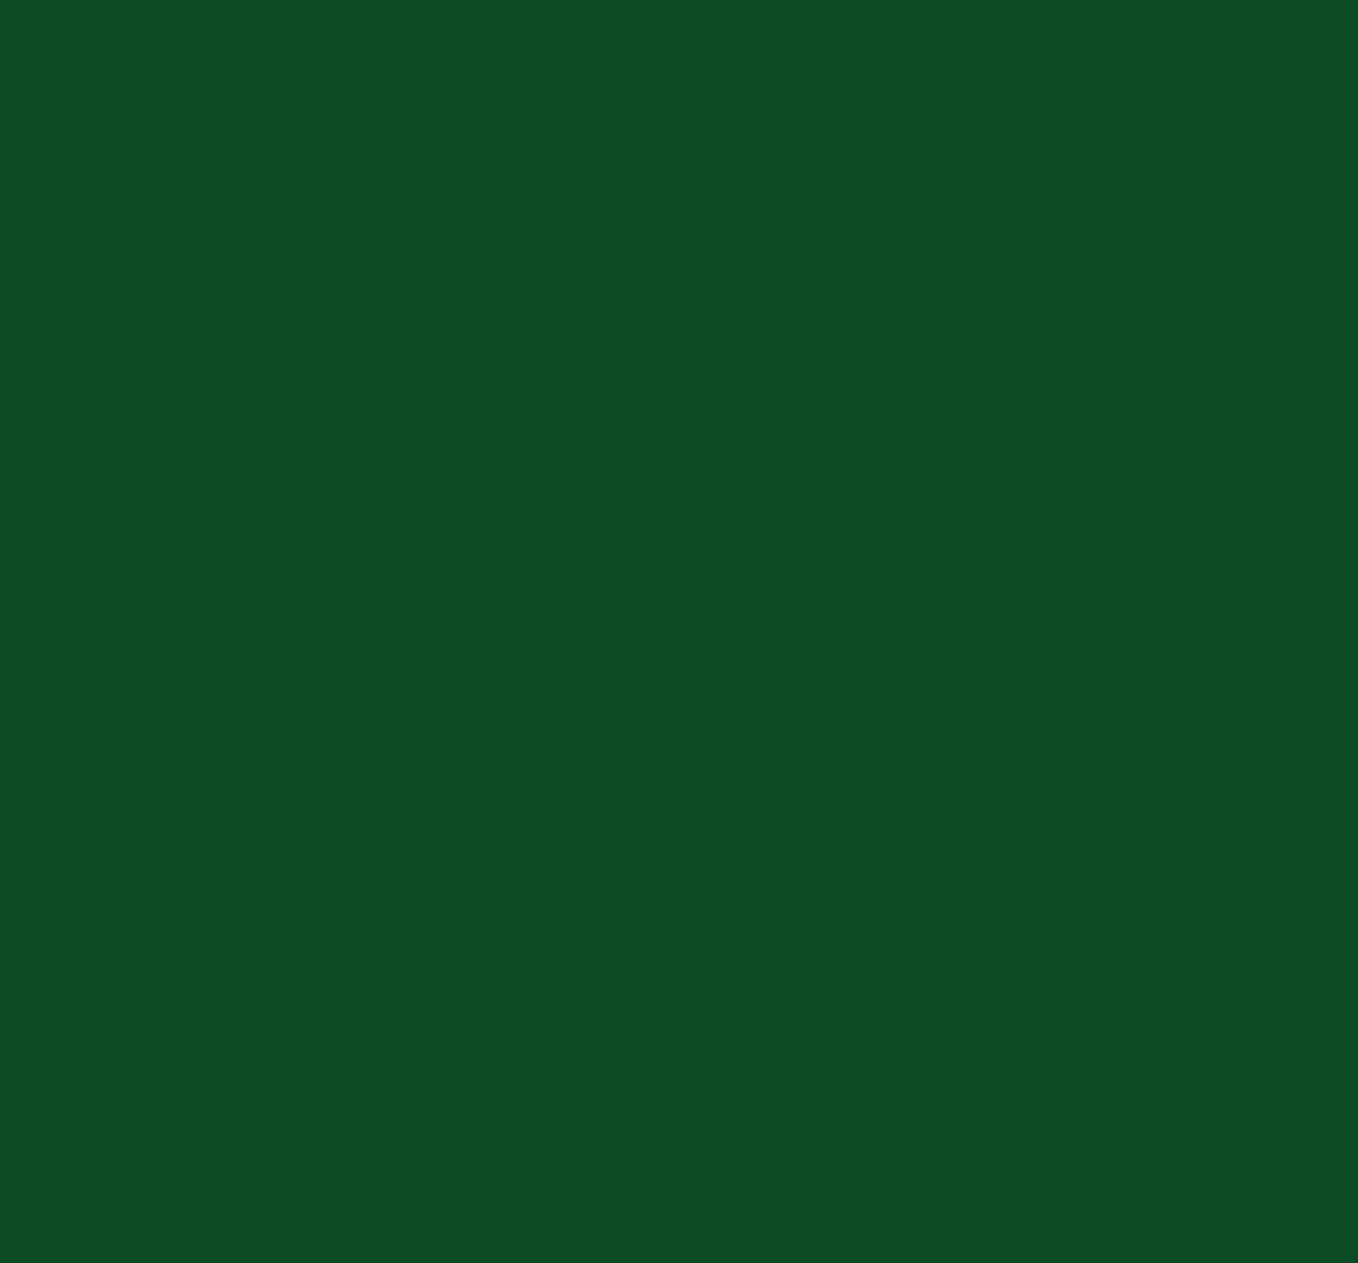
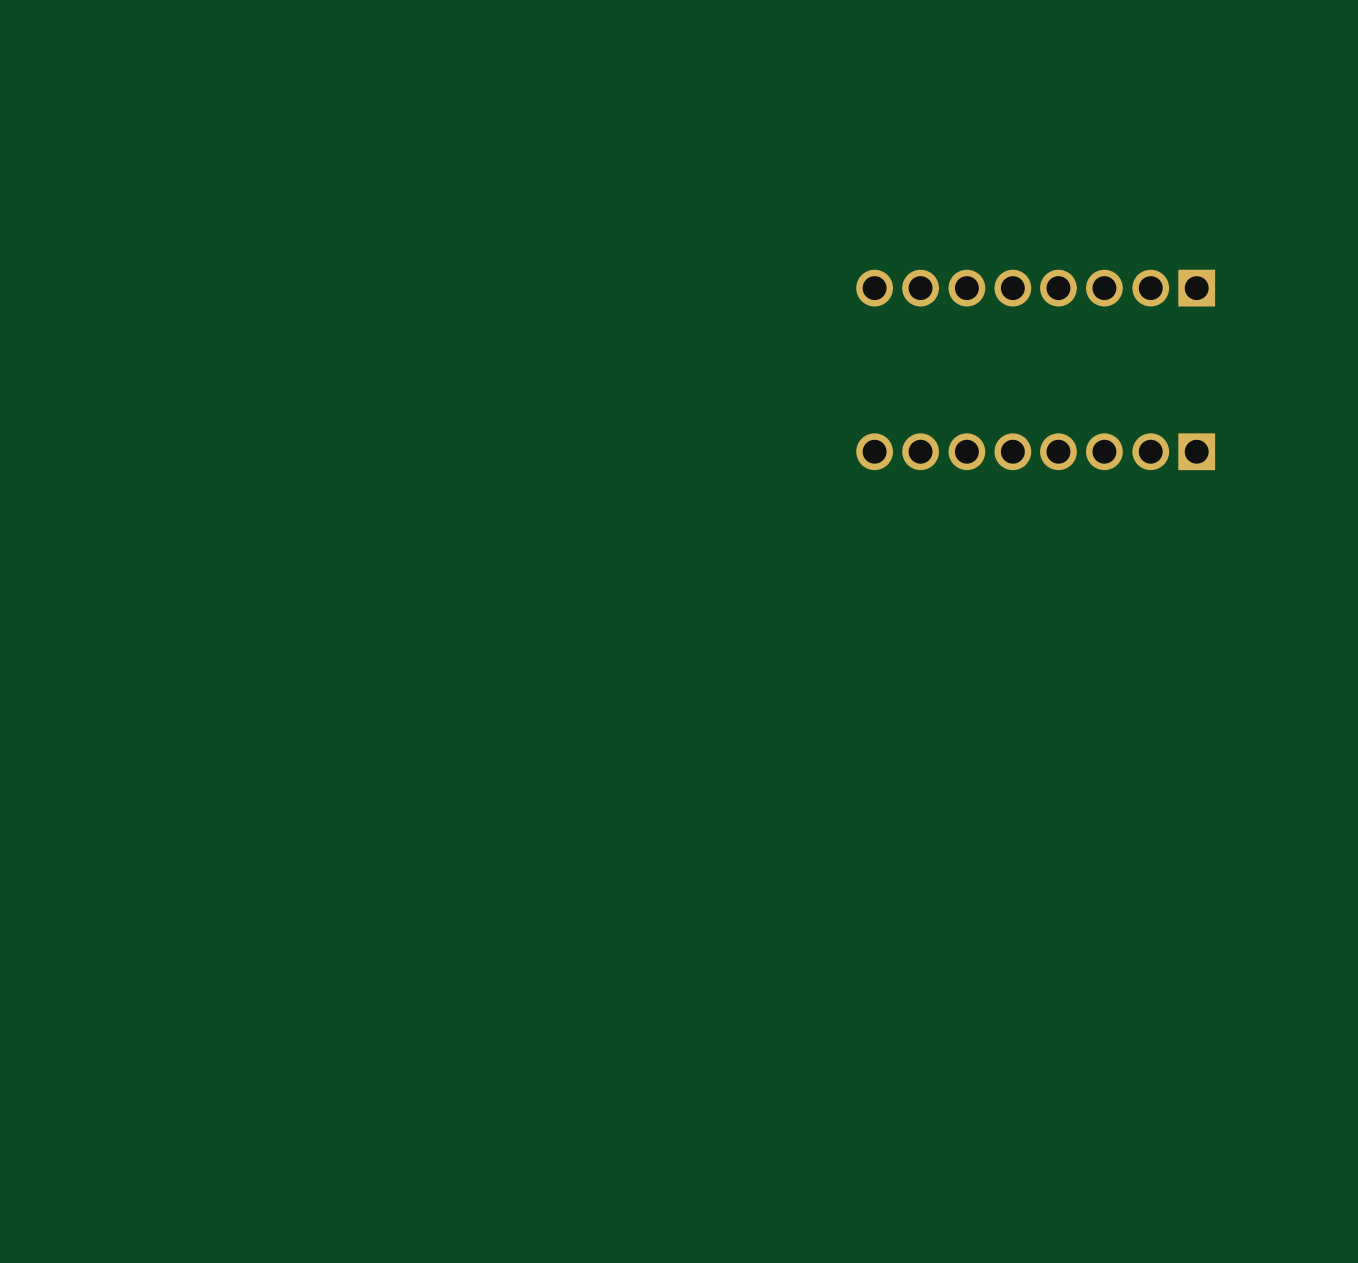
part: none -> (1035, 288)
part: none -> (1035, 451)

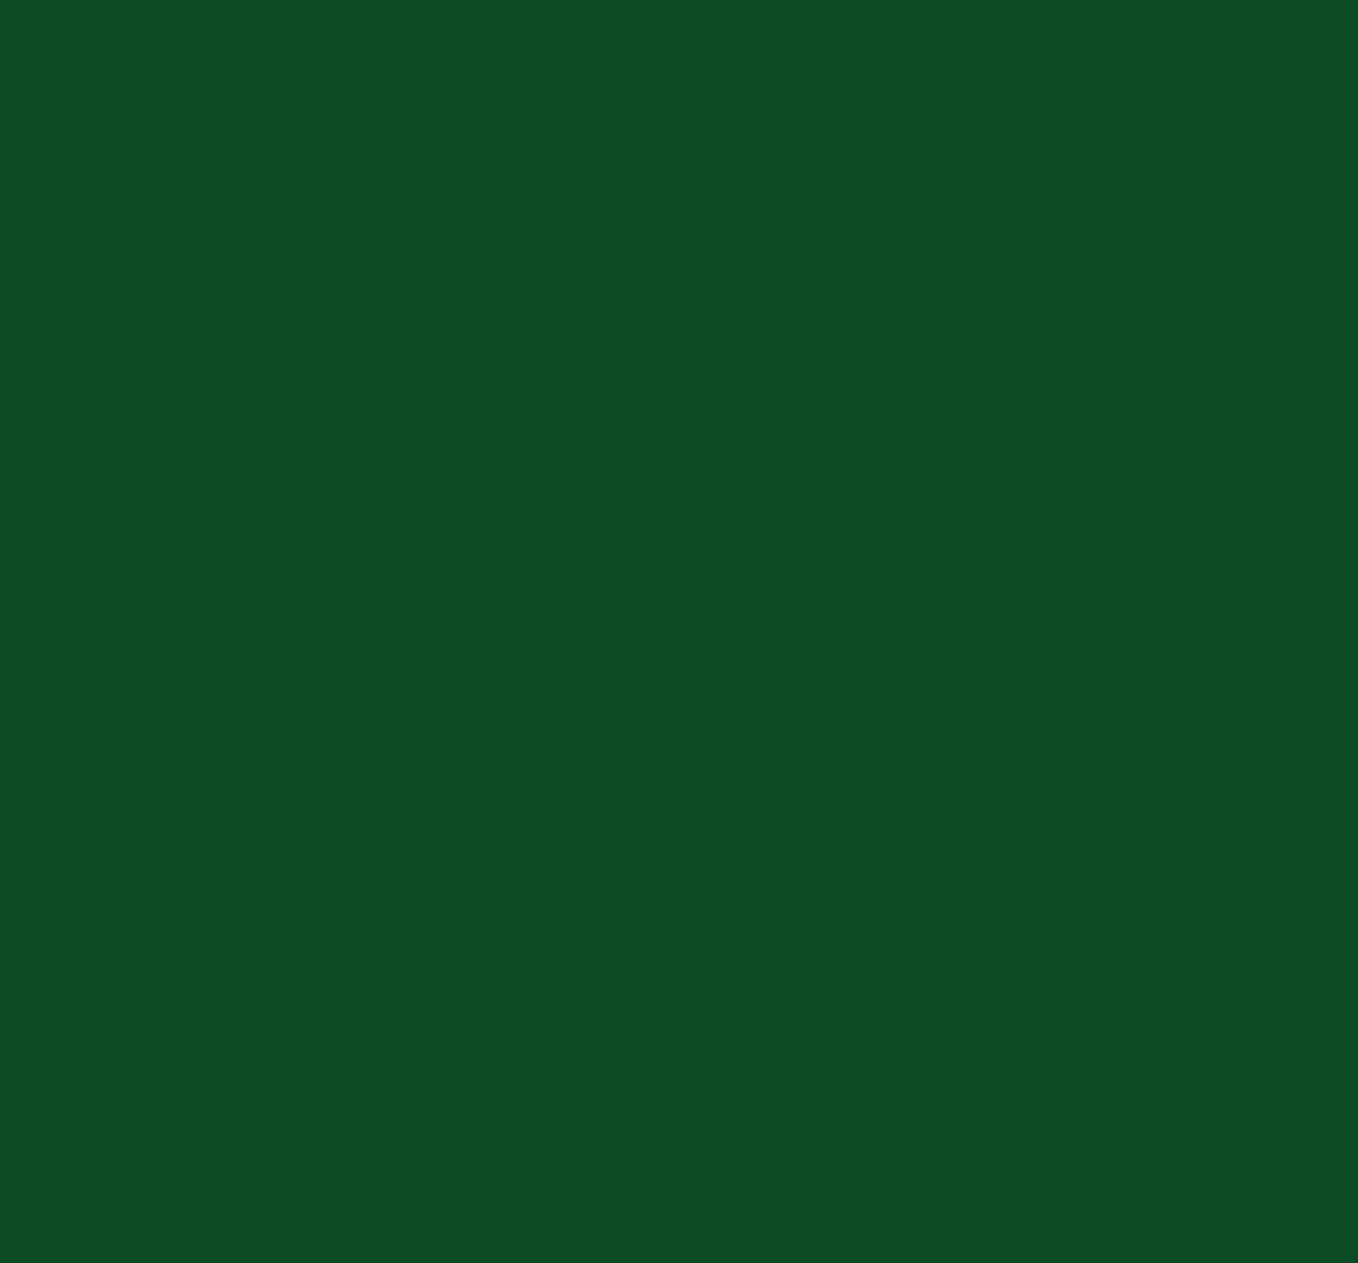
part: (1035, 288) -> none
part: (1035, 451) -> none

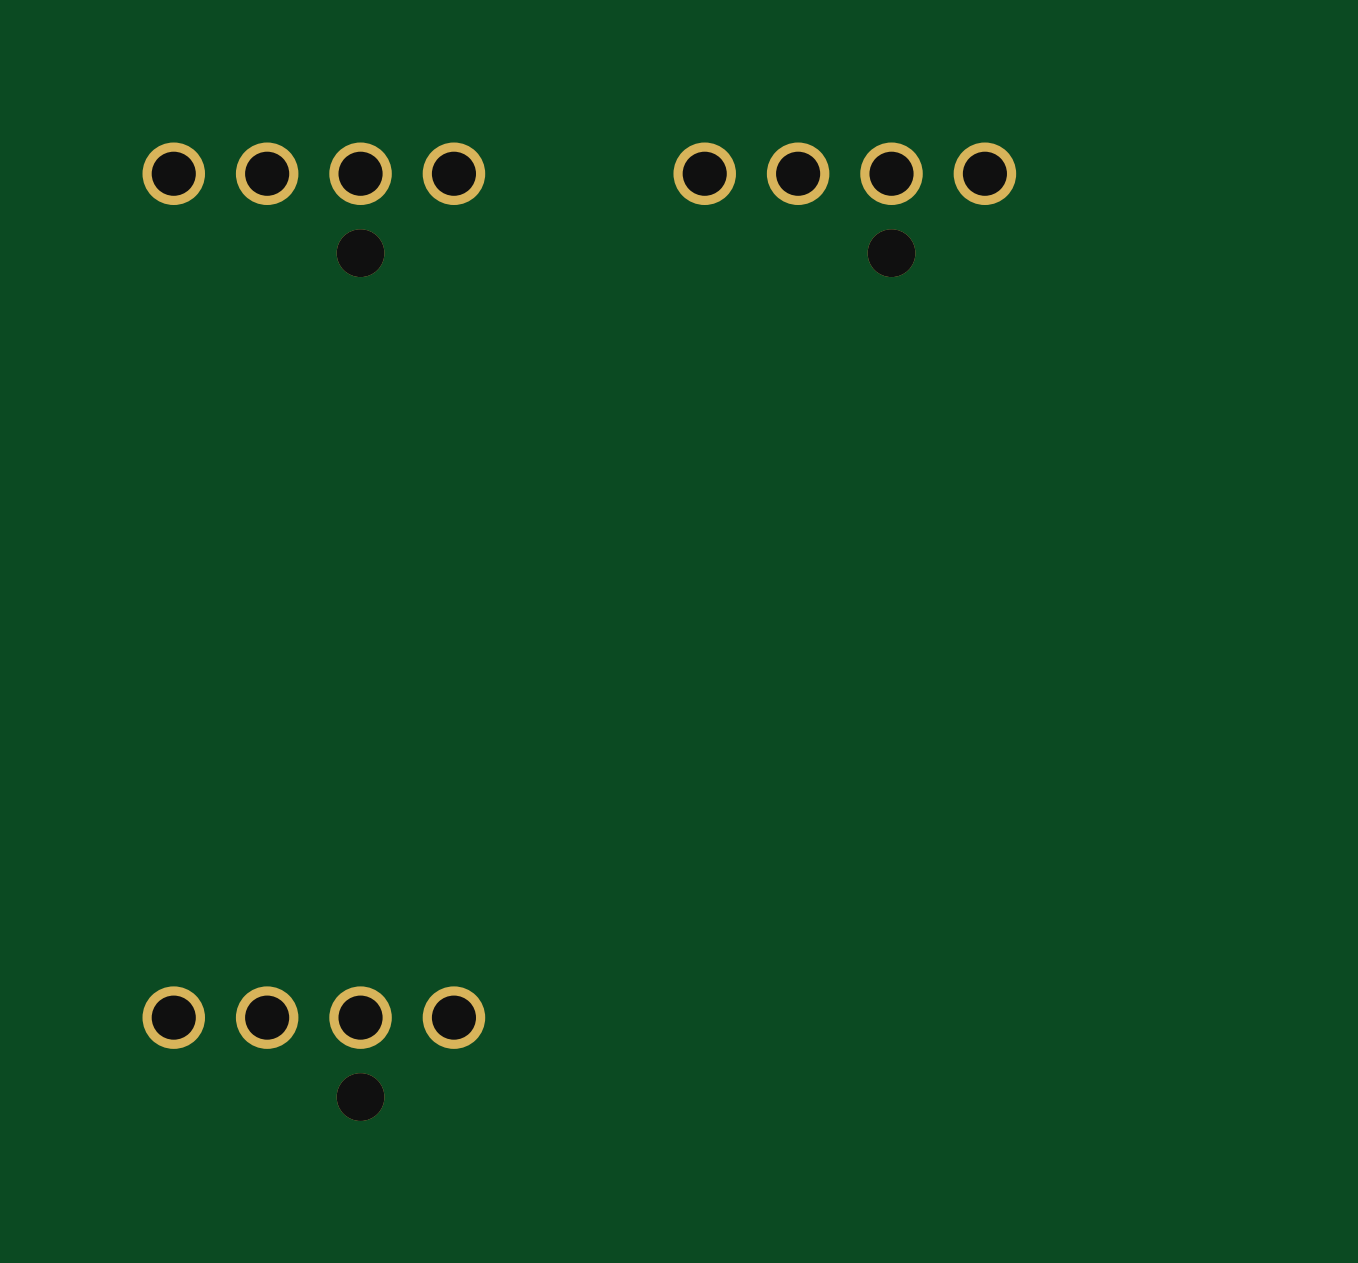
part: none -> (313, 209)
part: none -> (844, 209)
part: none -> (313, 1053)

